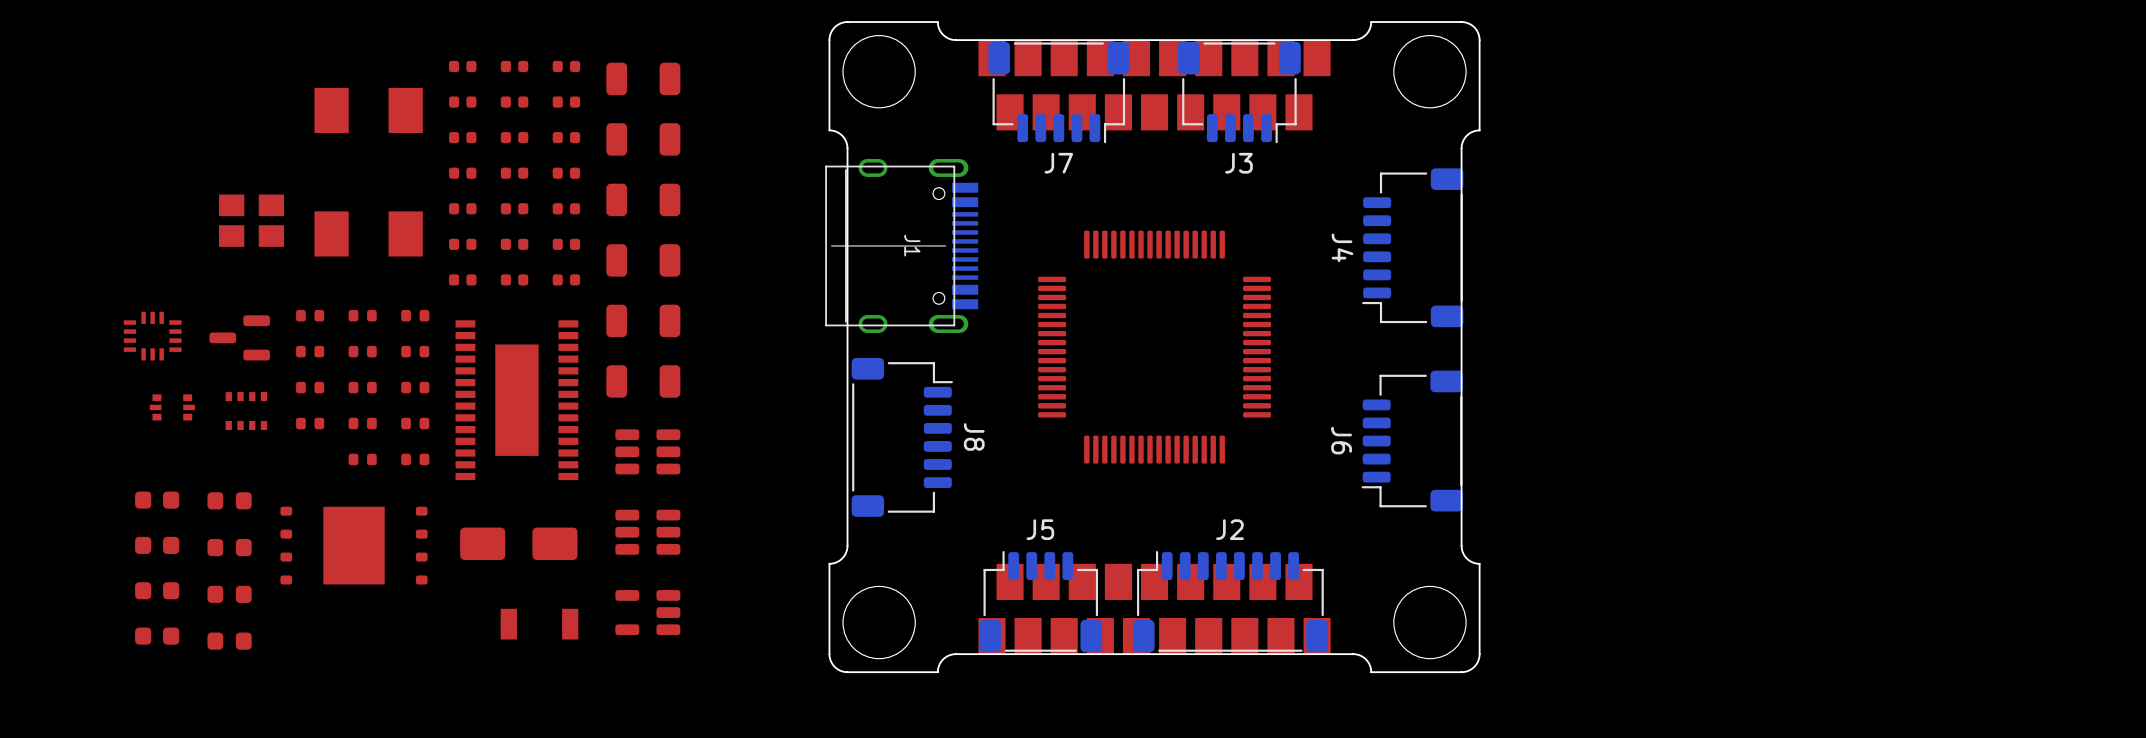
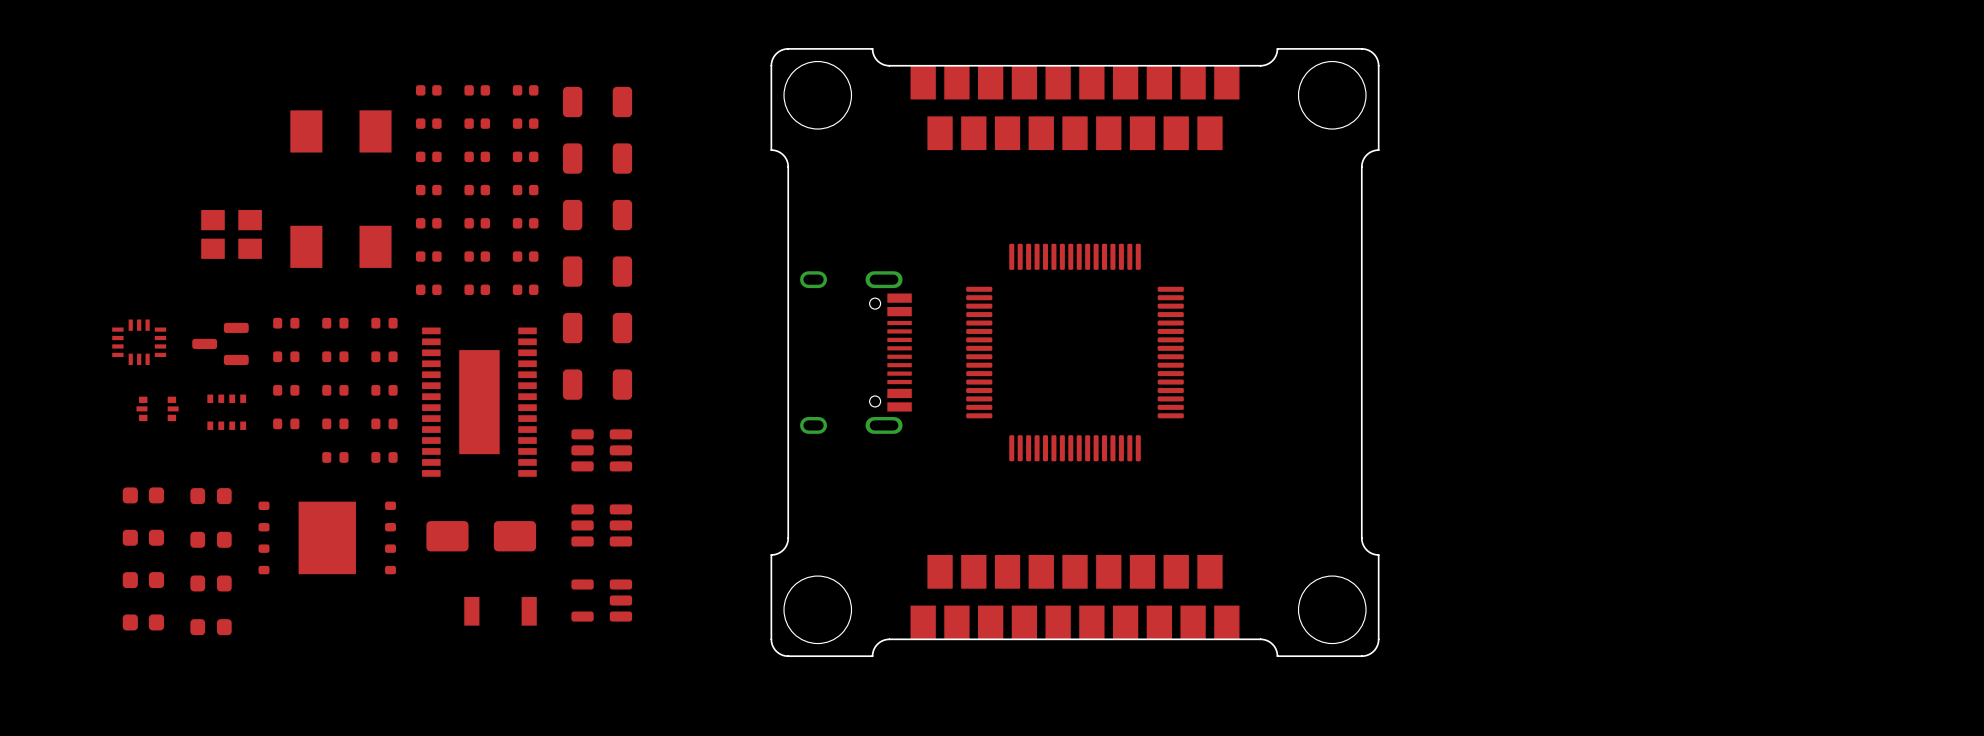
J7: (1058, 92) -> none
J3: (1239, 92) -> none
J1 side: bottom (901, 245) -> top (855, 352)
J4: (1412, 247) -> none
J8: (902, 437) -> none
J6: (1412, 441) -> none
J5: (1040, 601) -> none
J2: (1230, 601) -> none

